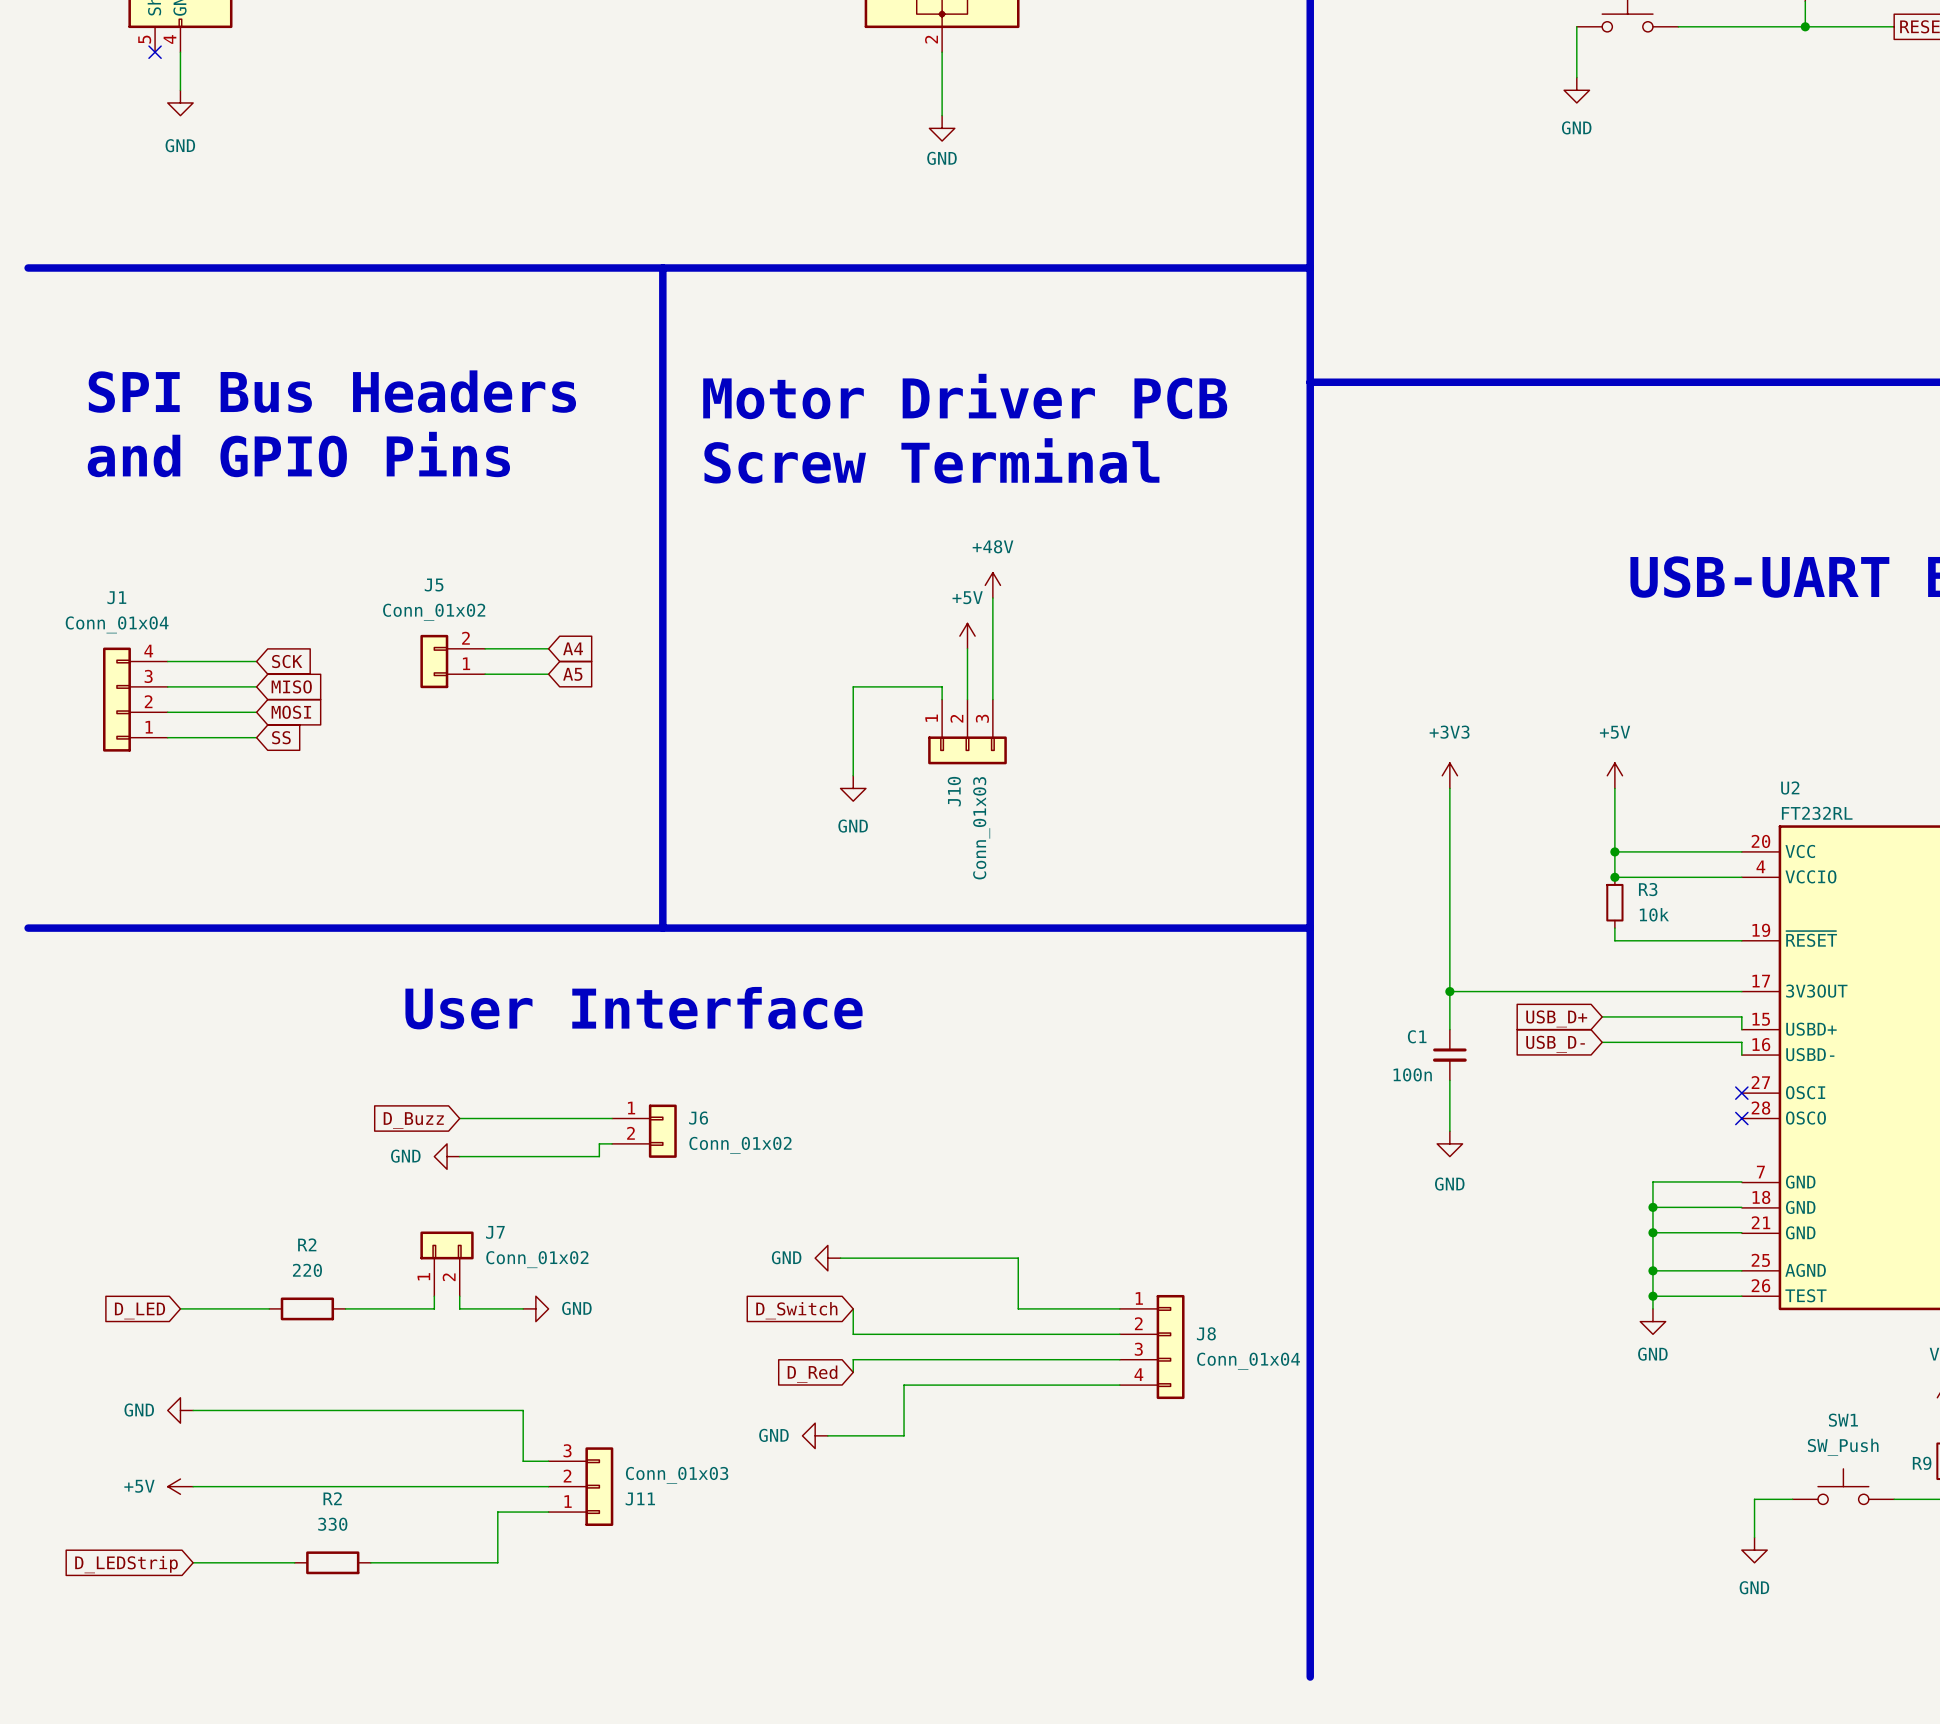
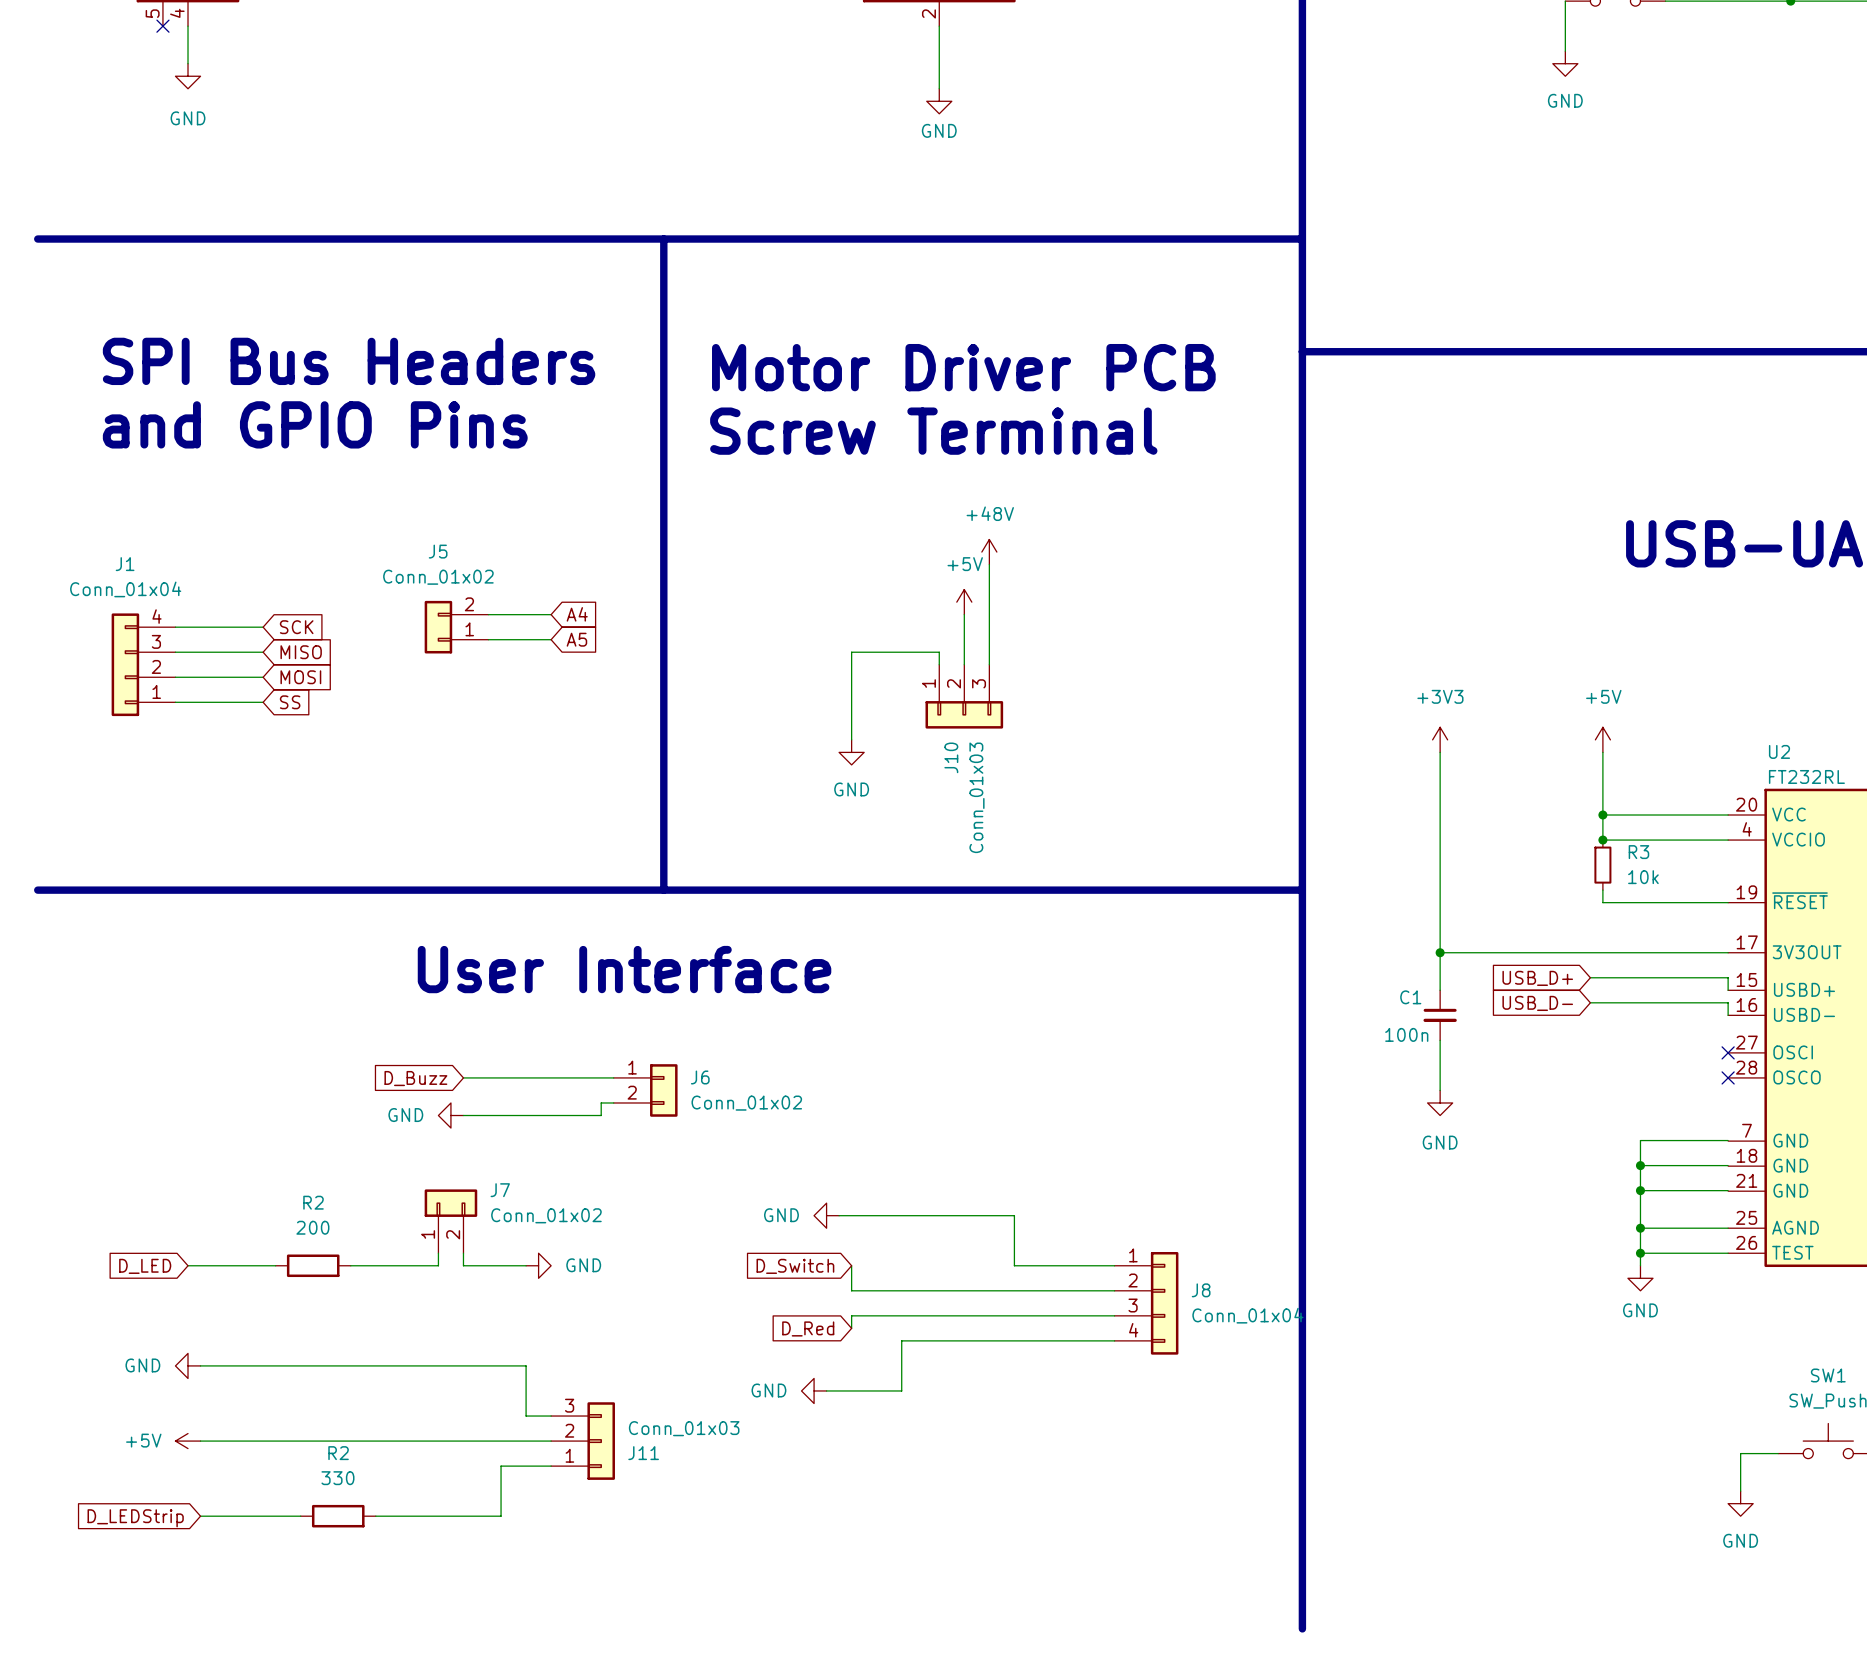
R2 value: 220 (307, 1270) -> 200 (312, 1227)

